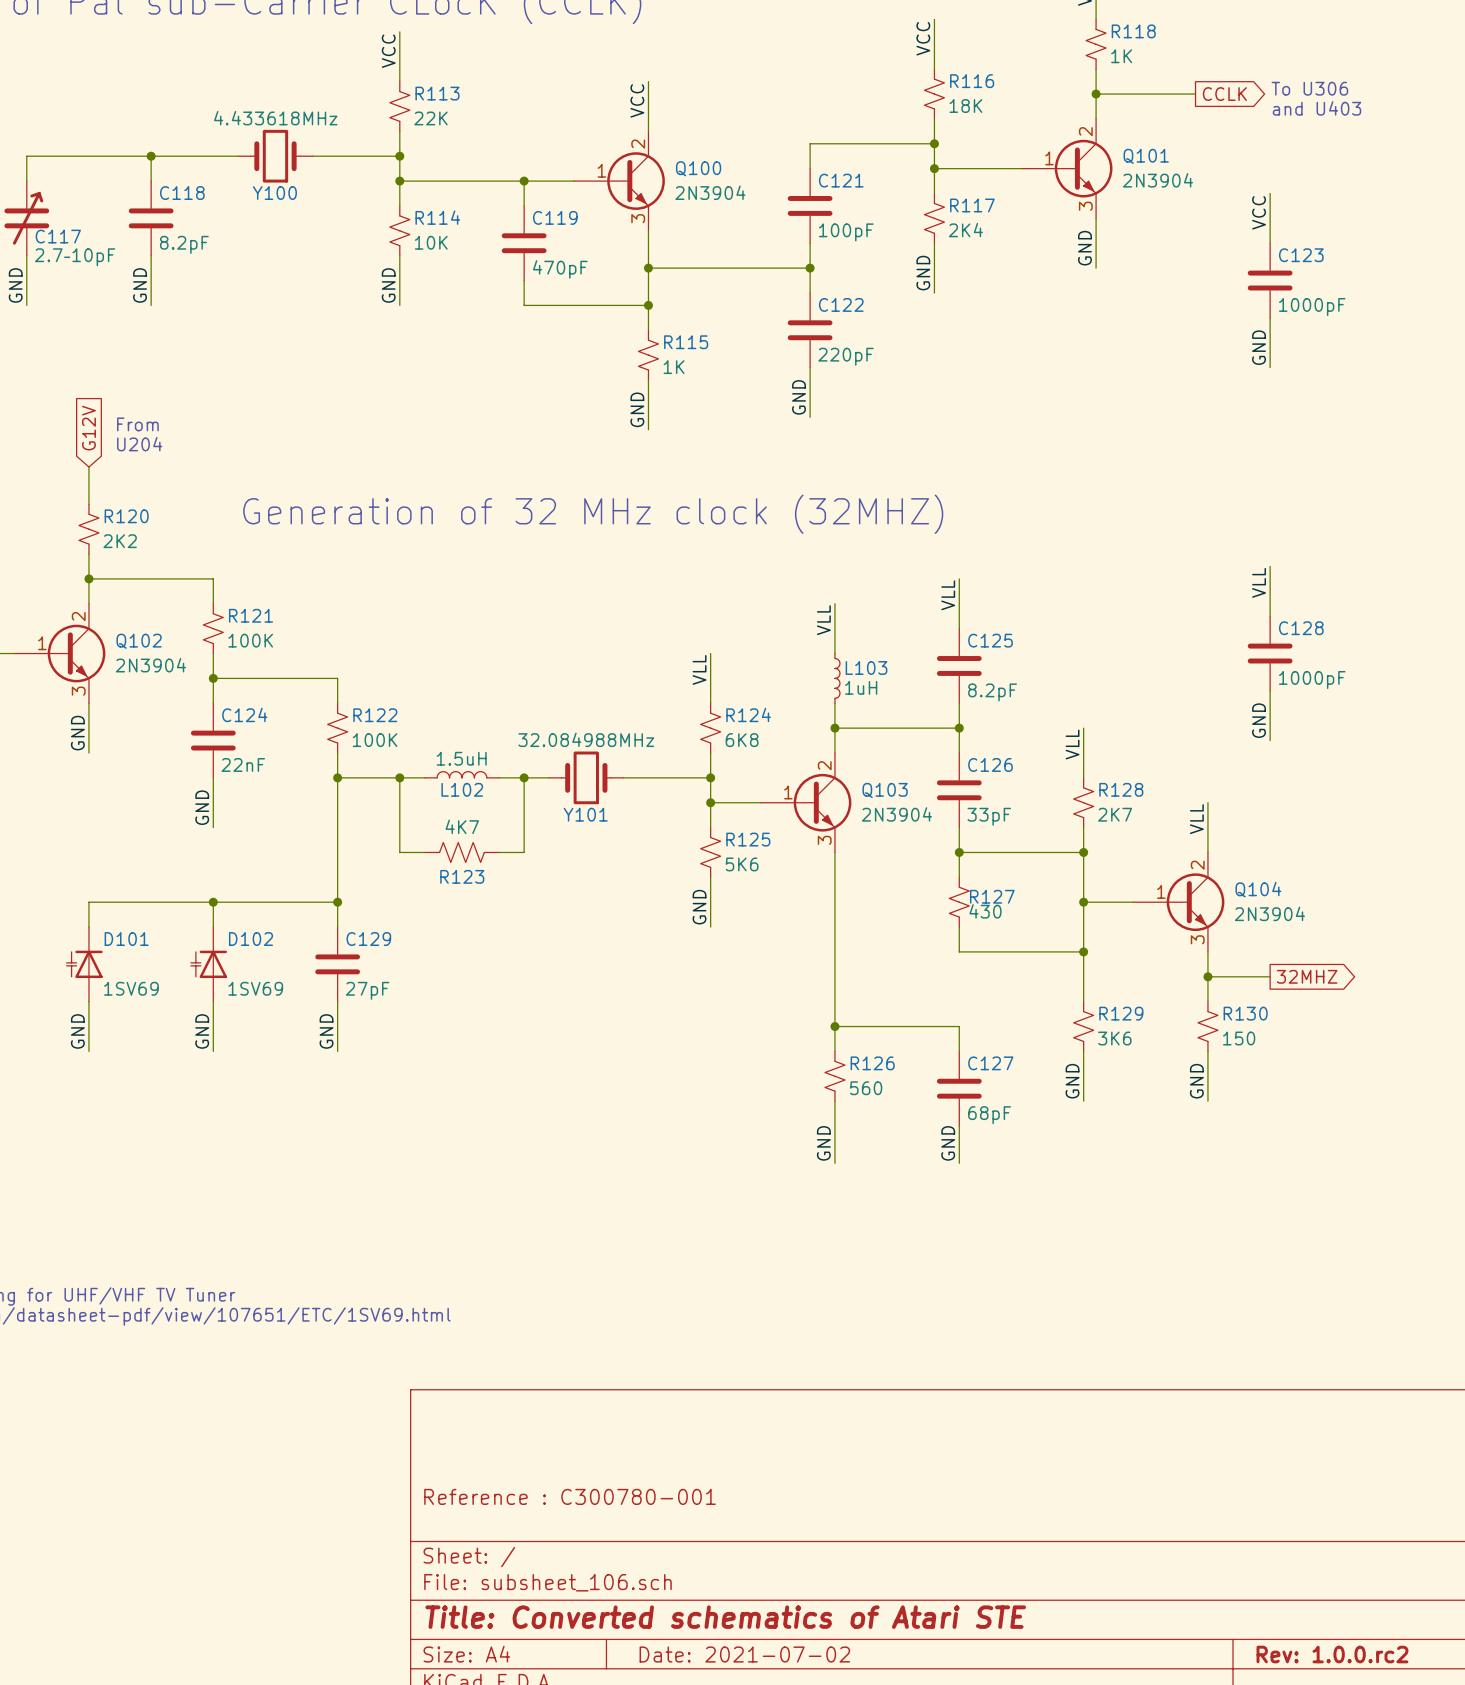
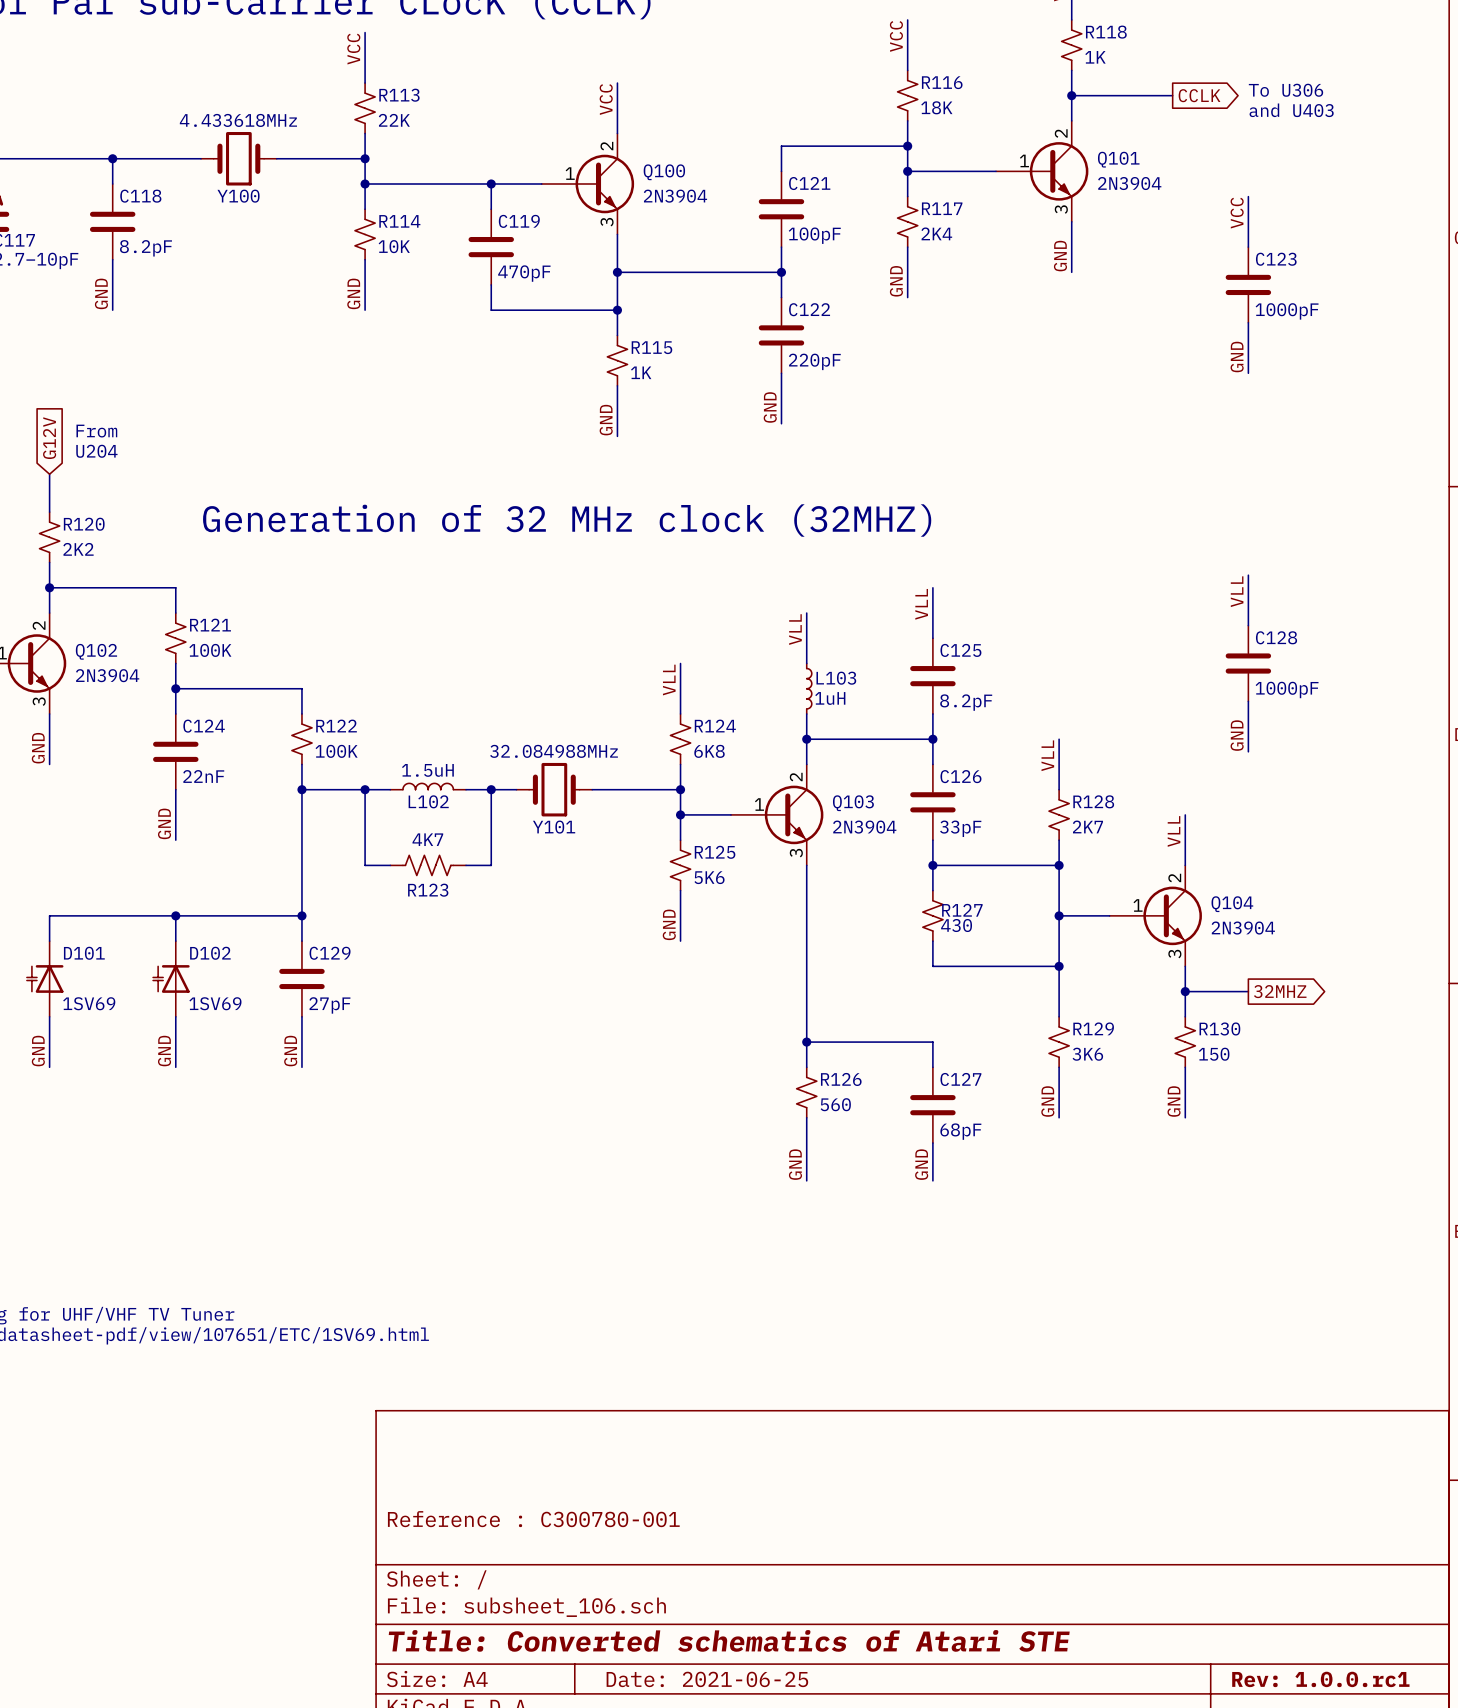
title block: Date: 2021-07-02 (744, 1654) -> Date: 2021-06-25 (707, 1679)
title block: Rev: 1.0.0.rc2 (1332, 1654) -> Rev: 1.0.0.rc1 (1320, 1679)

